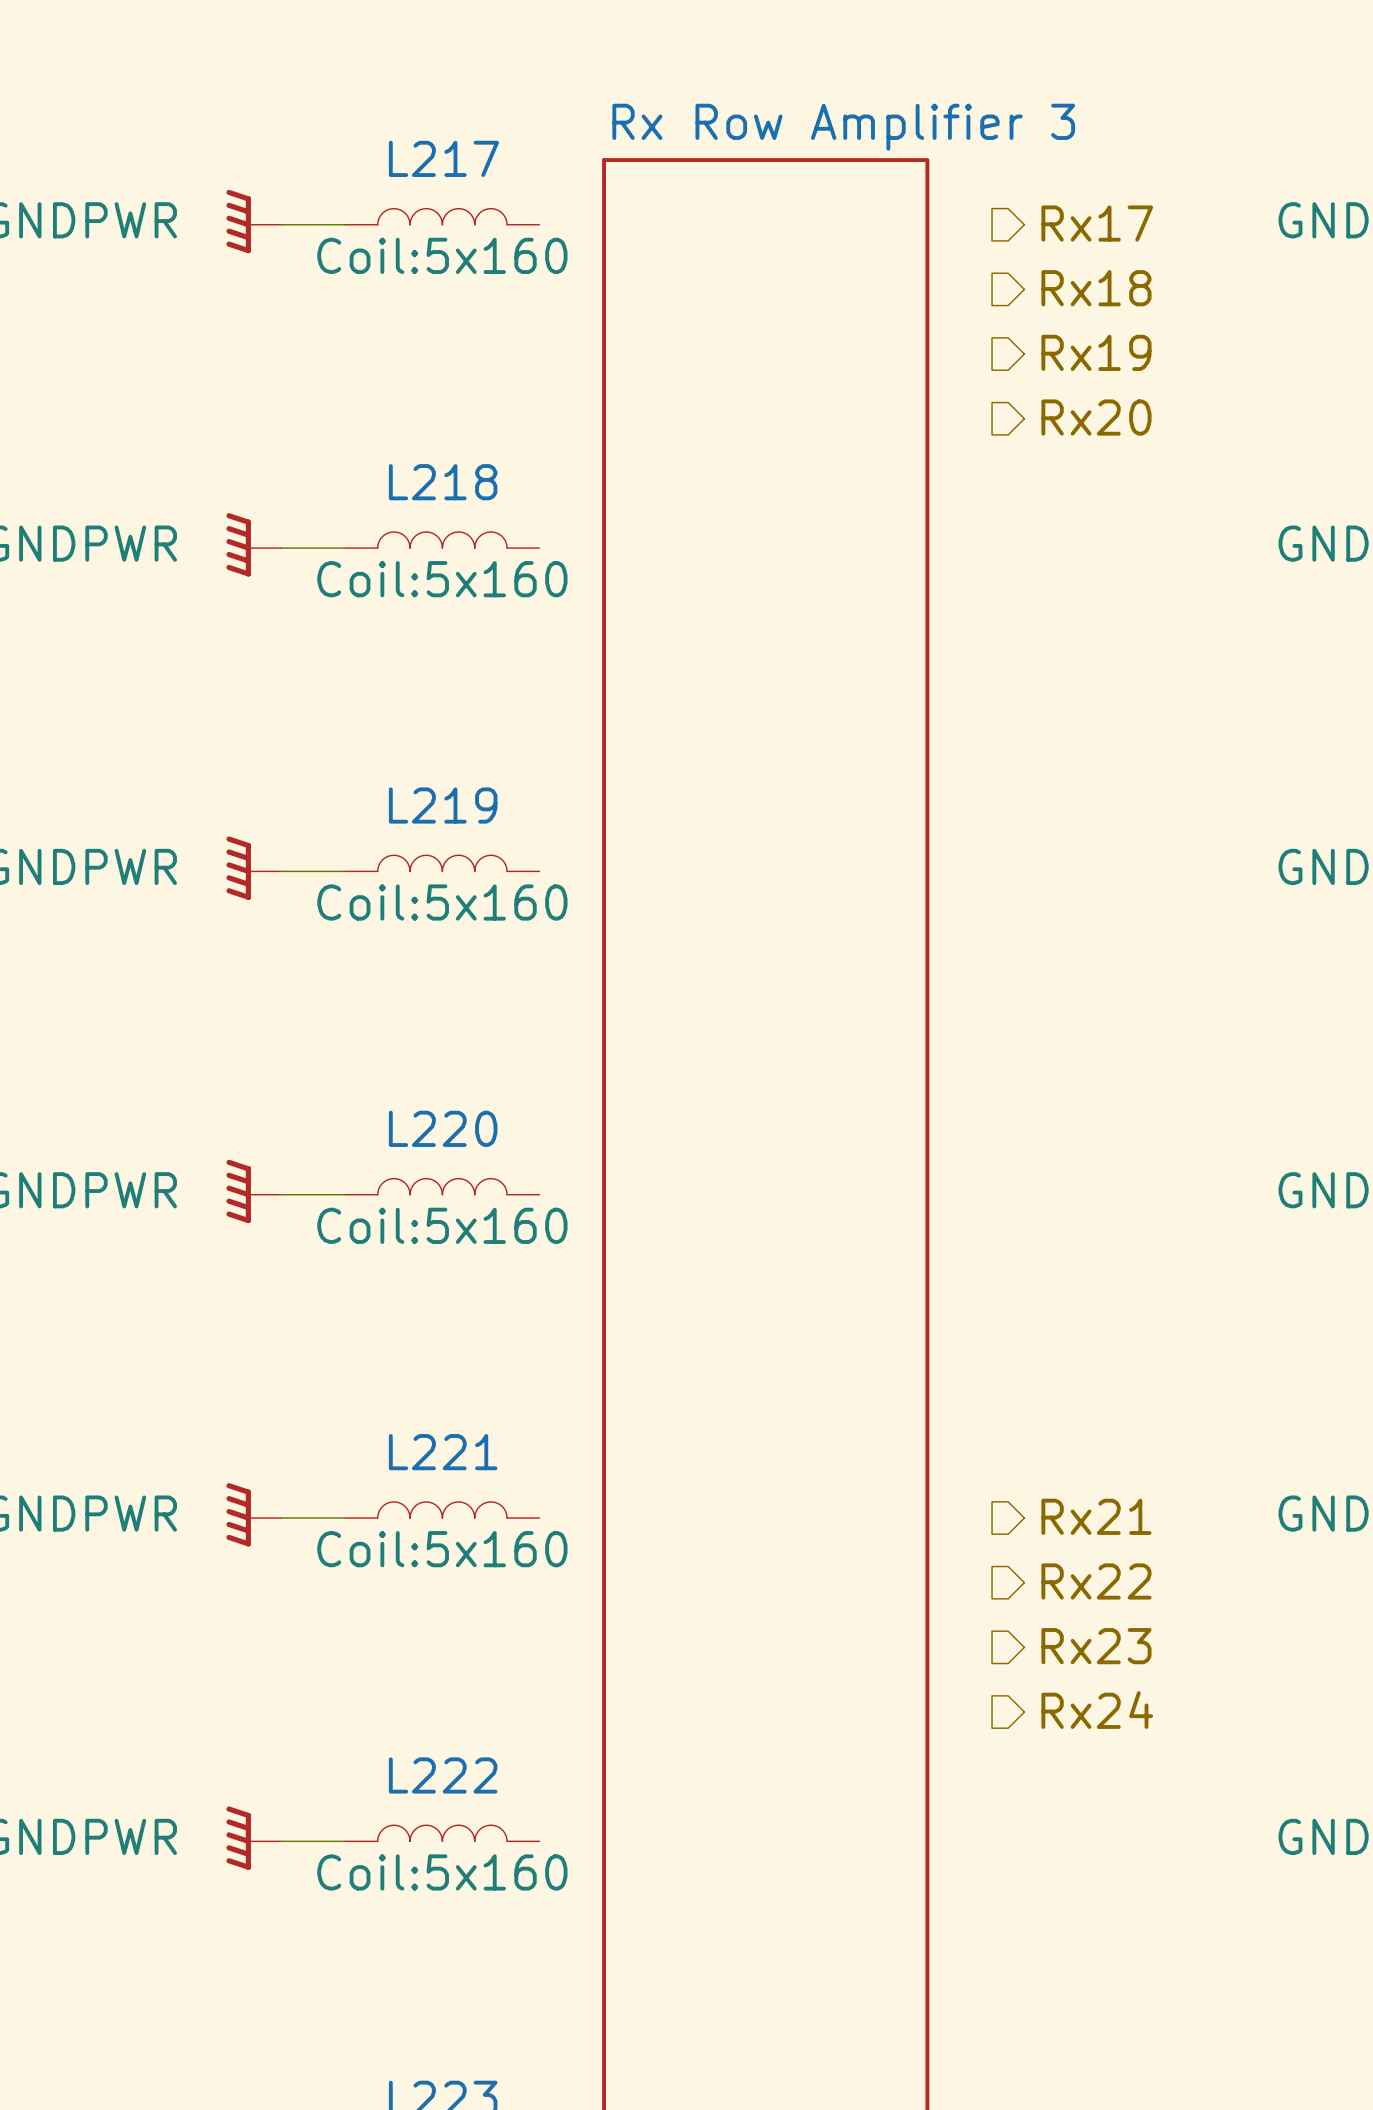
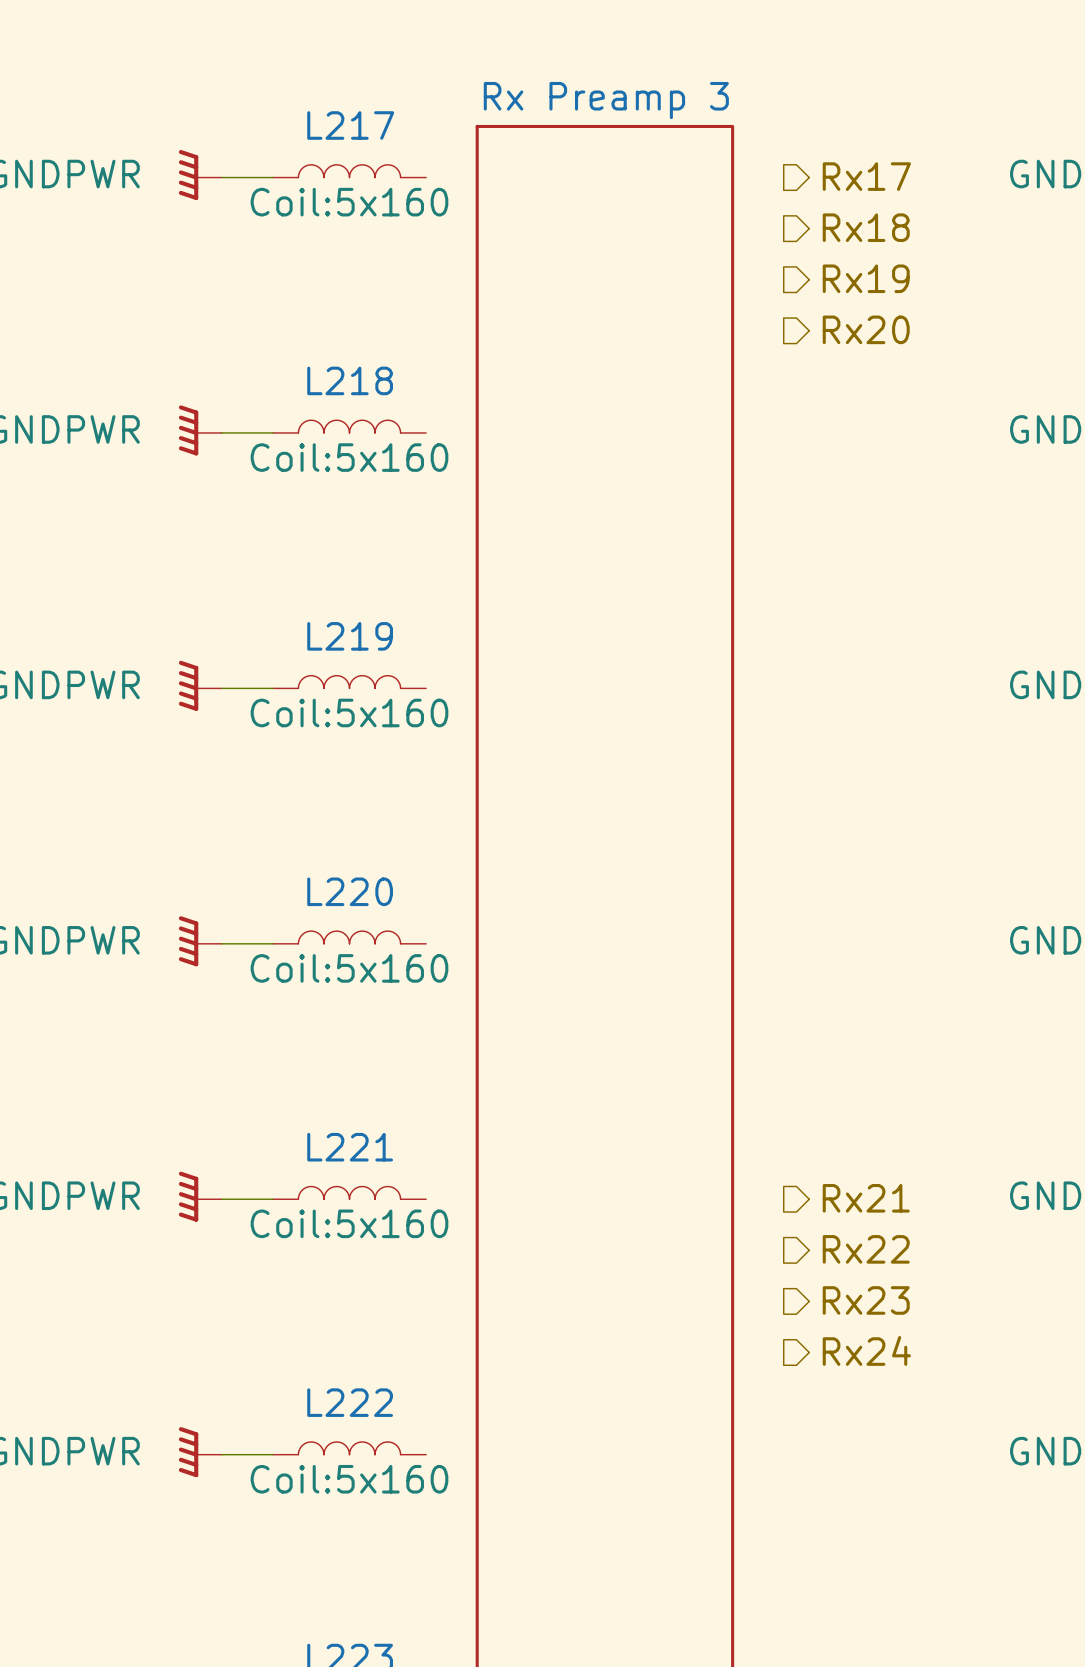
sheet Rx Row Amplifier 3 name: Rx Row Amplifier 3 (843, 127) -> Rx Preamp 3 (606, 100)

